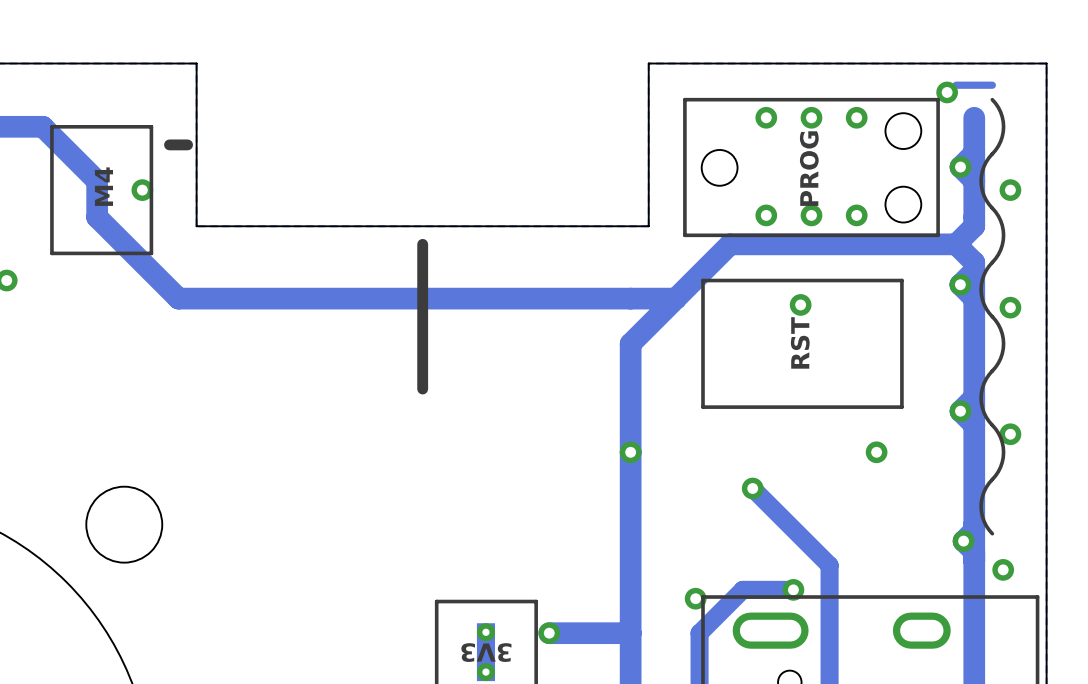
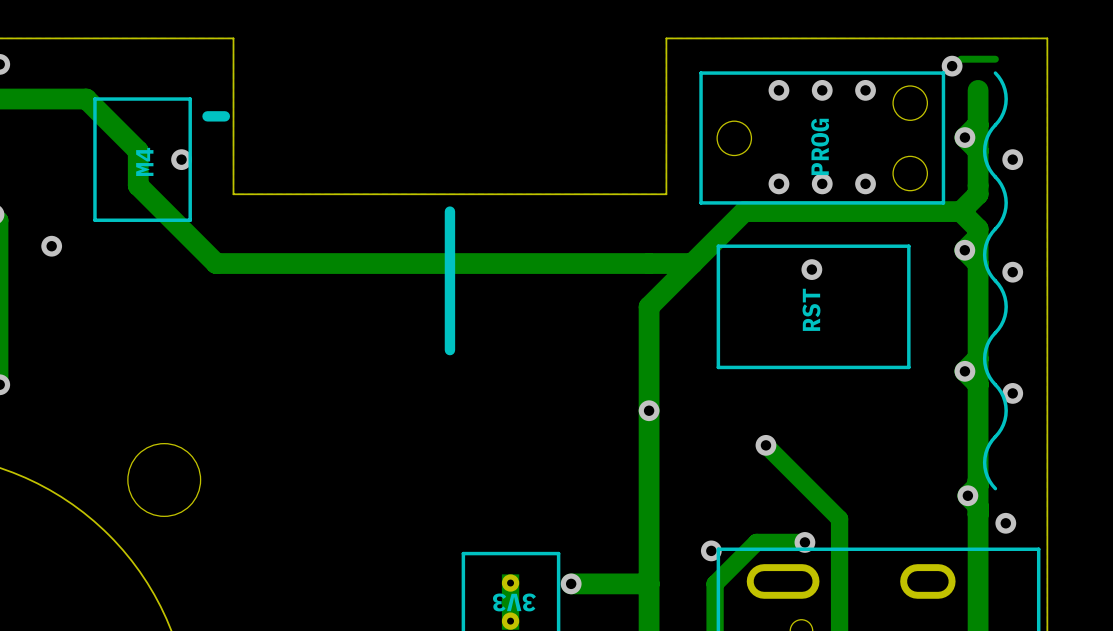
via: (876, 452) -> none

